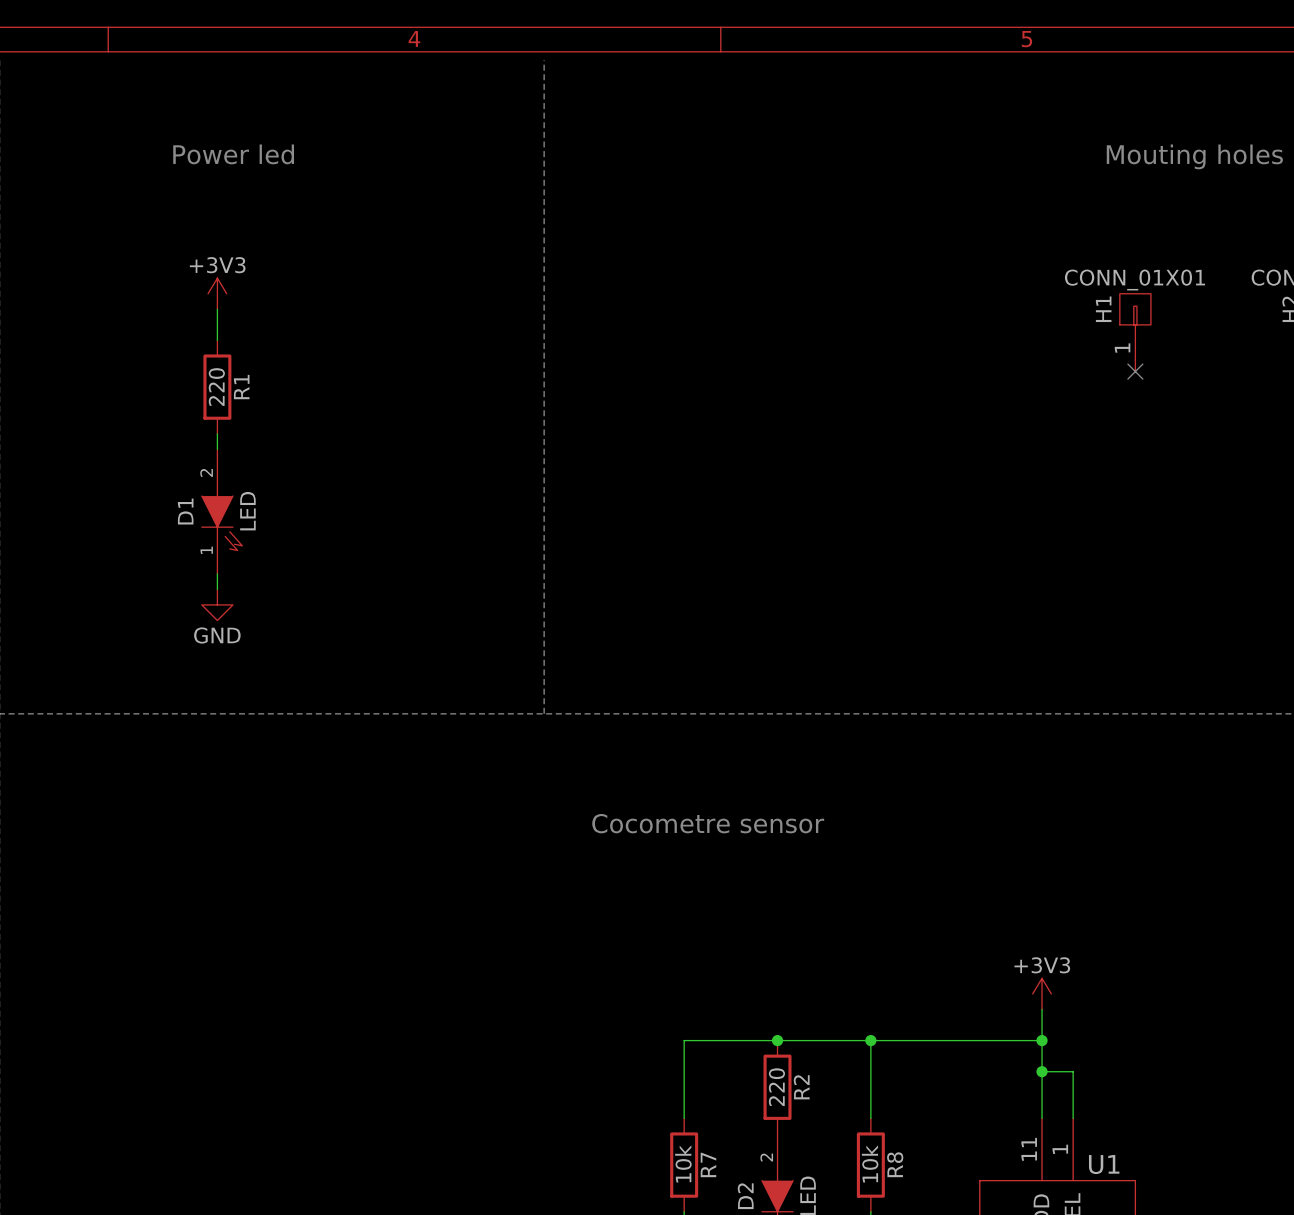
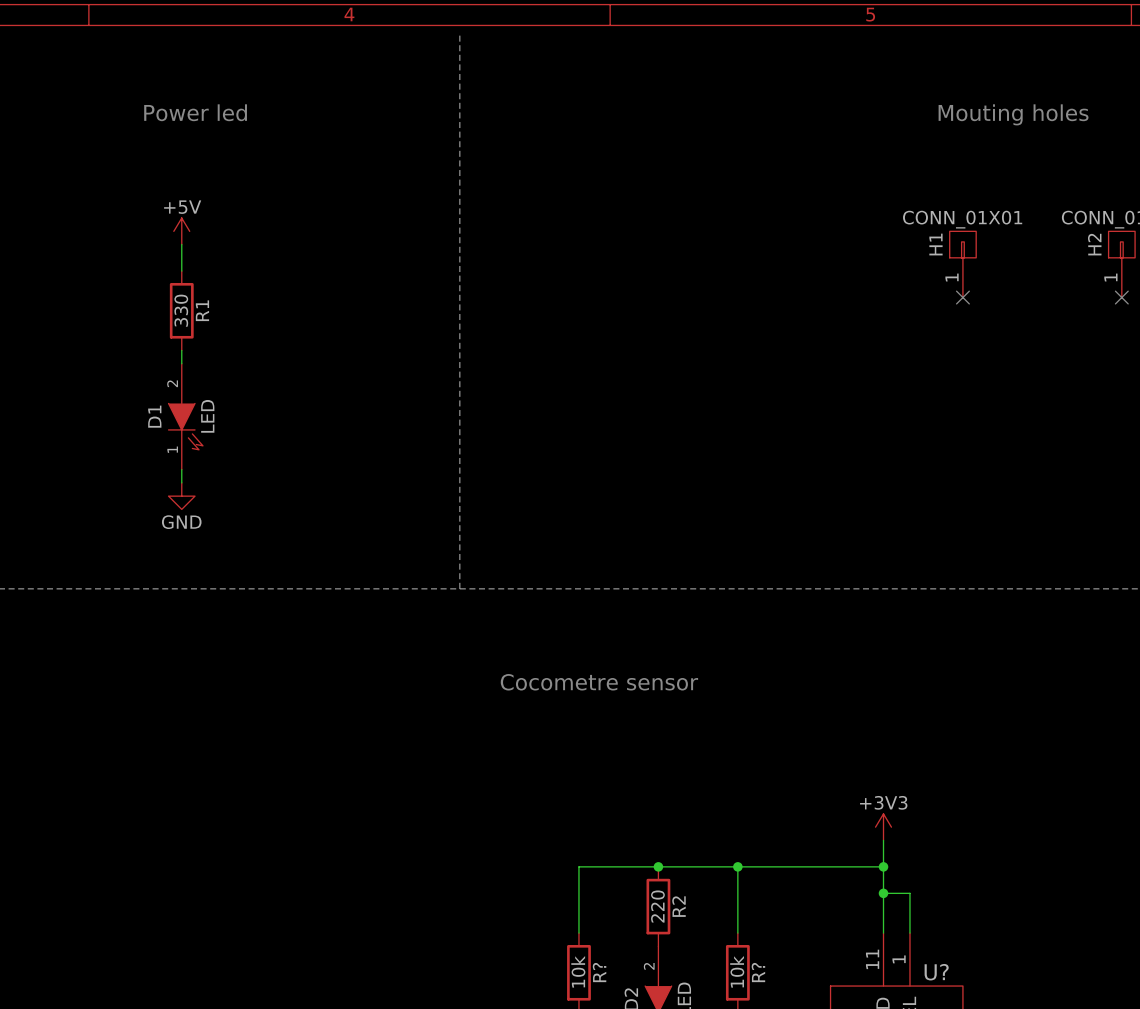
power symbol: +3V3 (217, 293) -> +5V (181, 231)
R1 value: 220 (216, 387) -> 330 (181, 310)
R7 name: R7 (708, 1164) -> R? (599, 972)
R8 name: R8 (895, 1164) -> R? (758, 972)
U1 name: U1 (1104, 1164) -> U? (936, 972)

